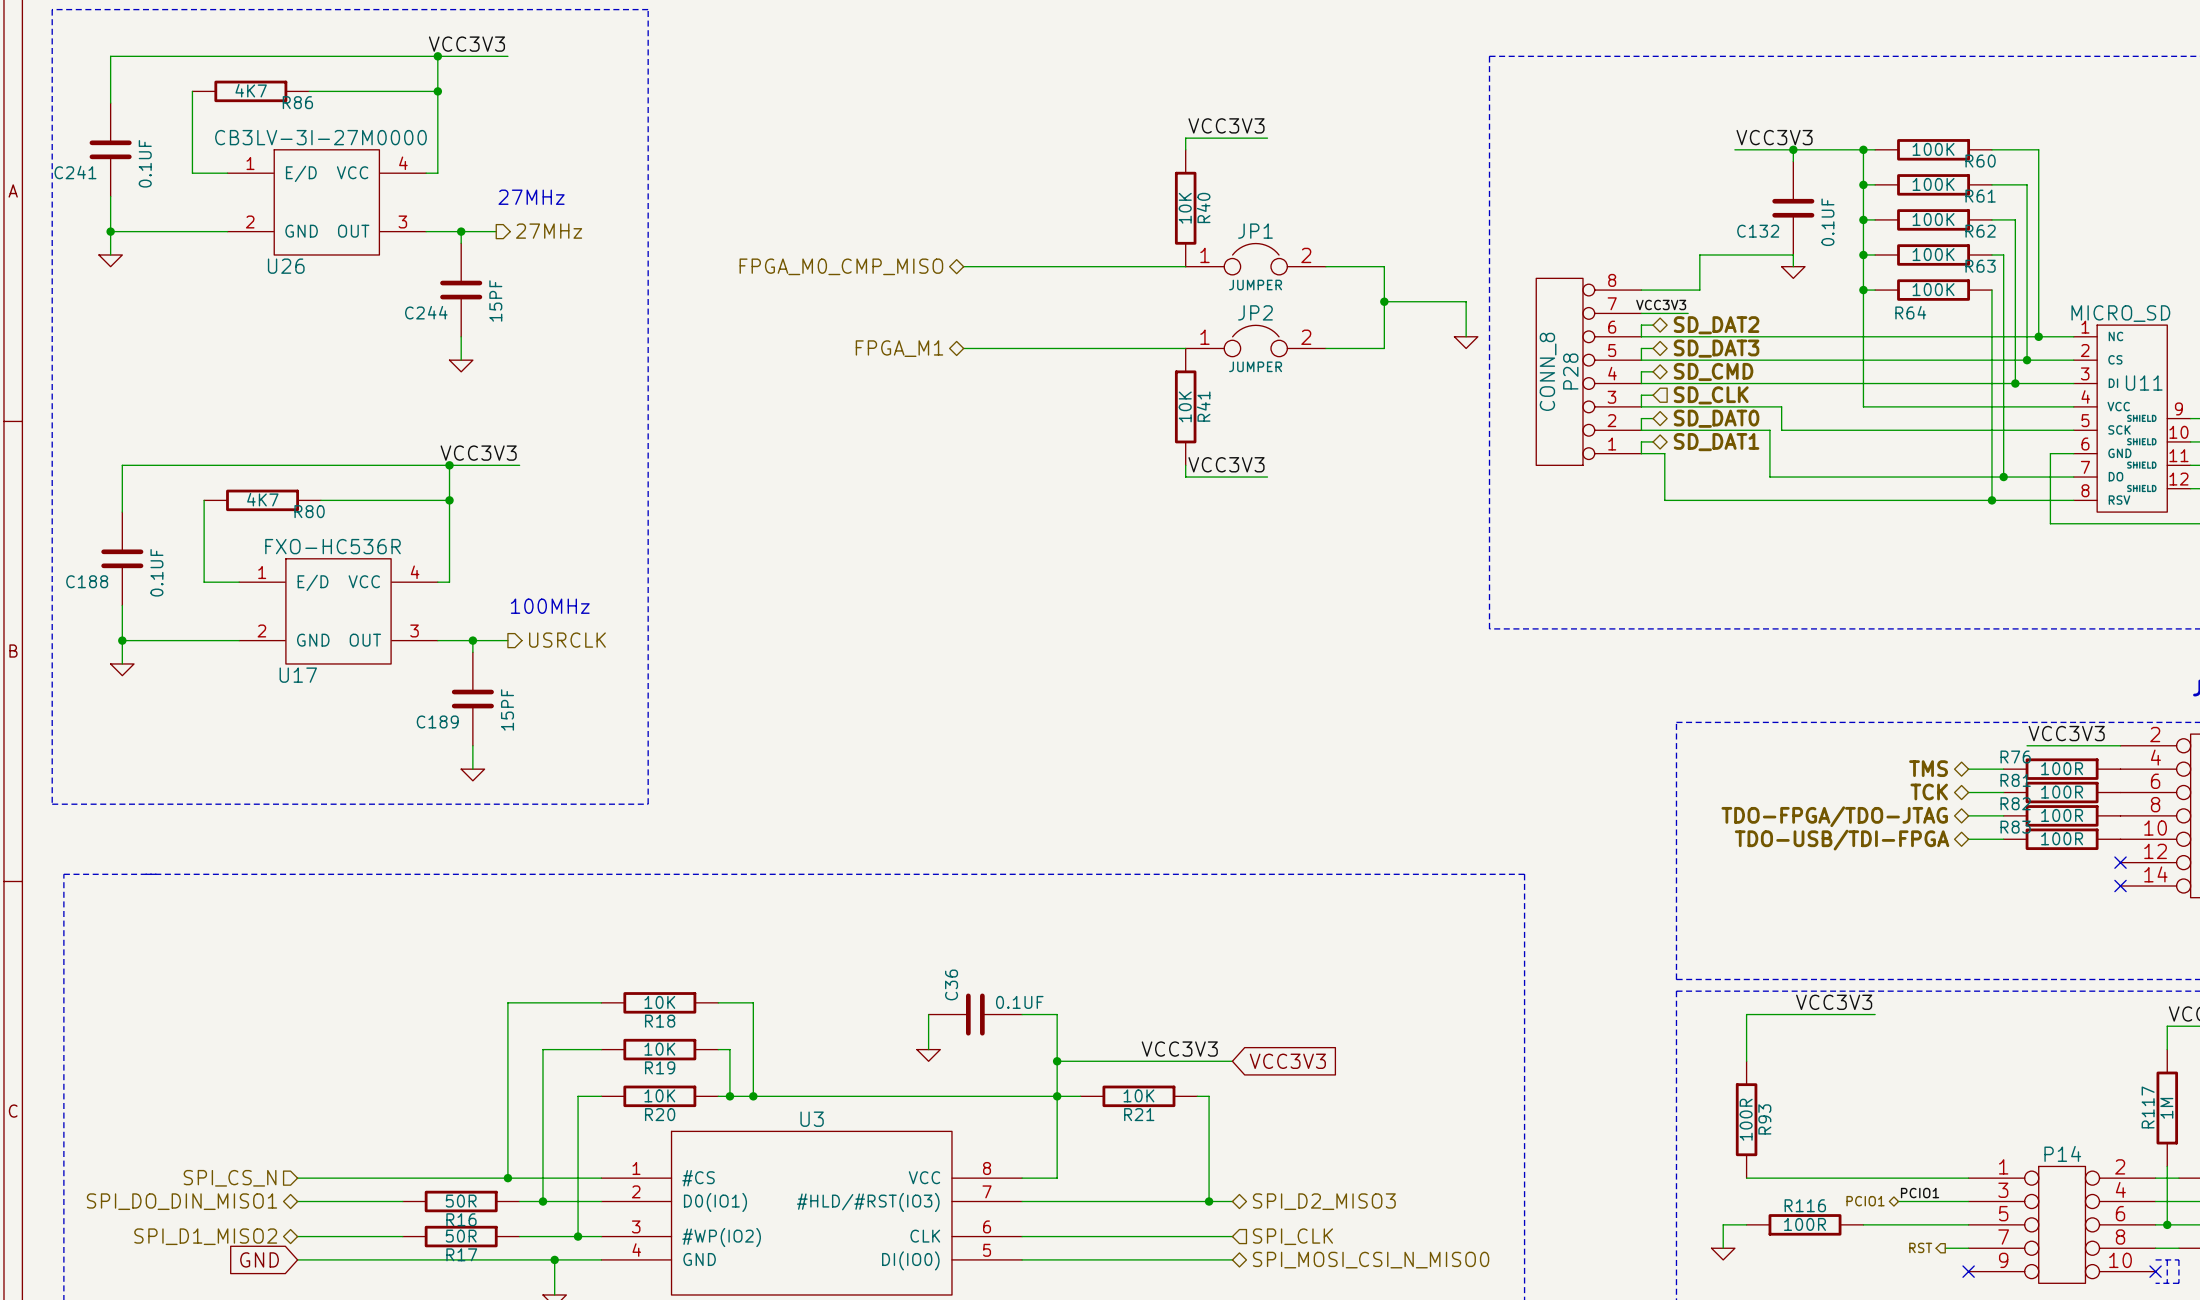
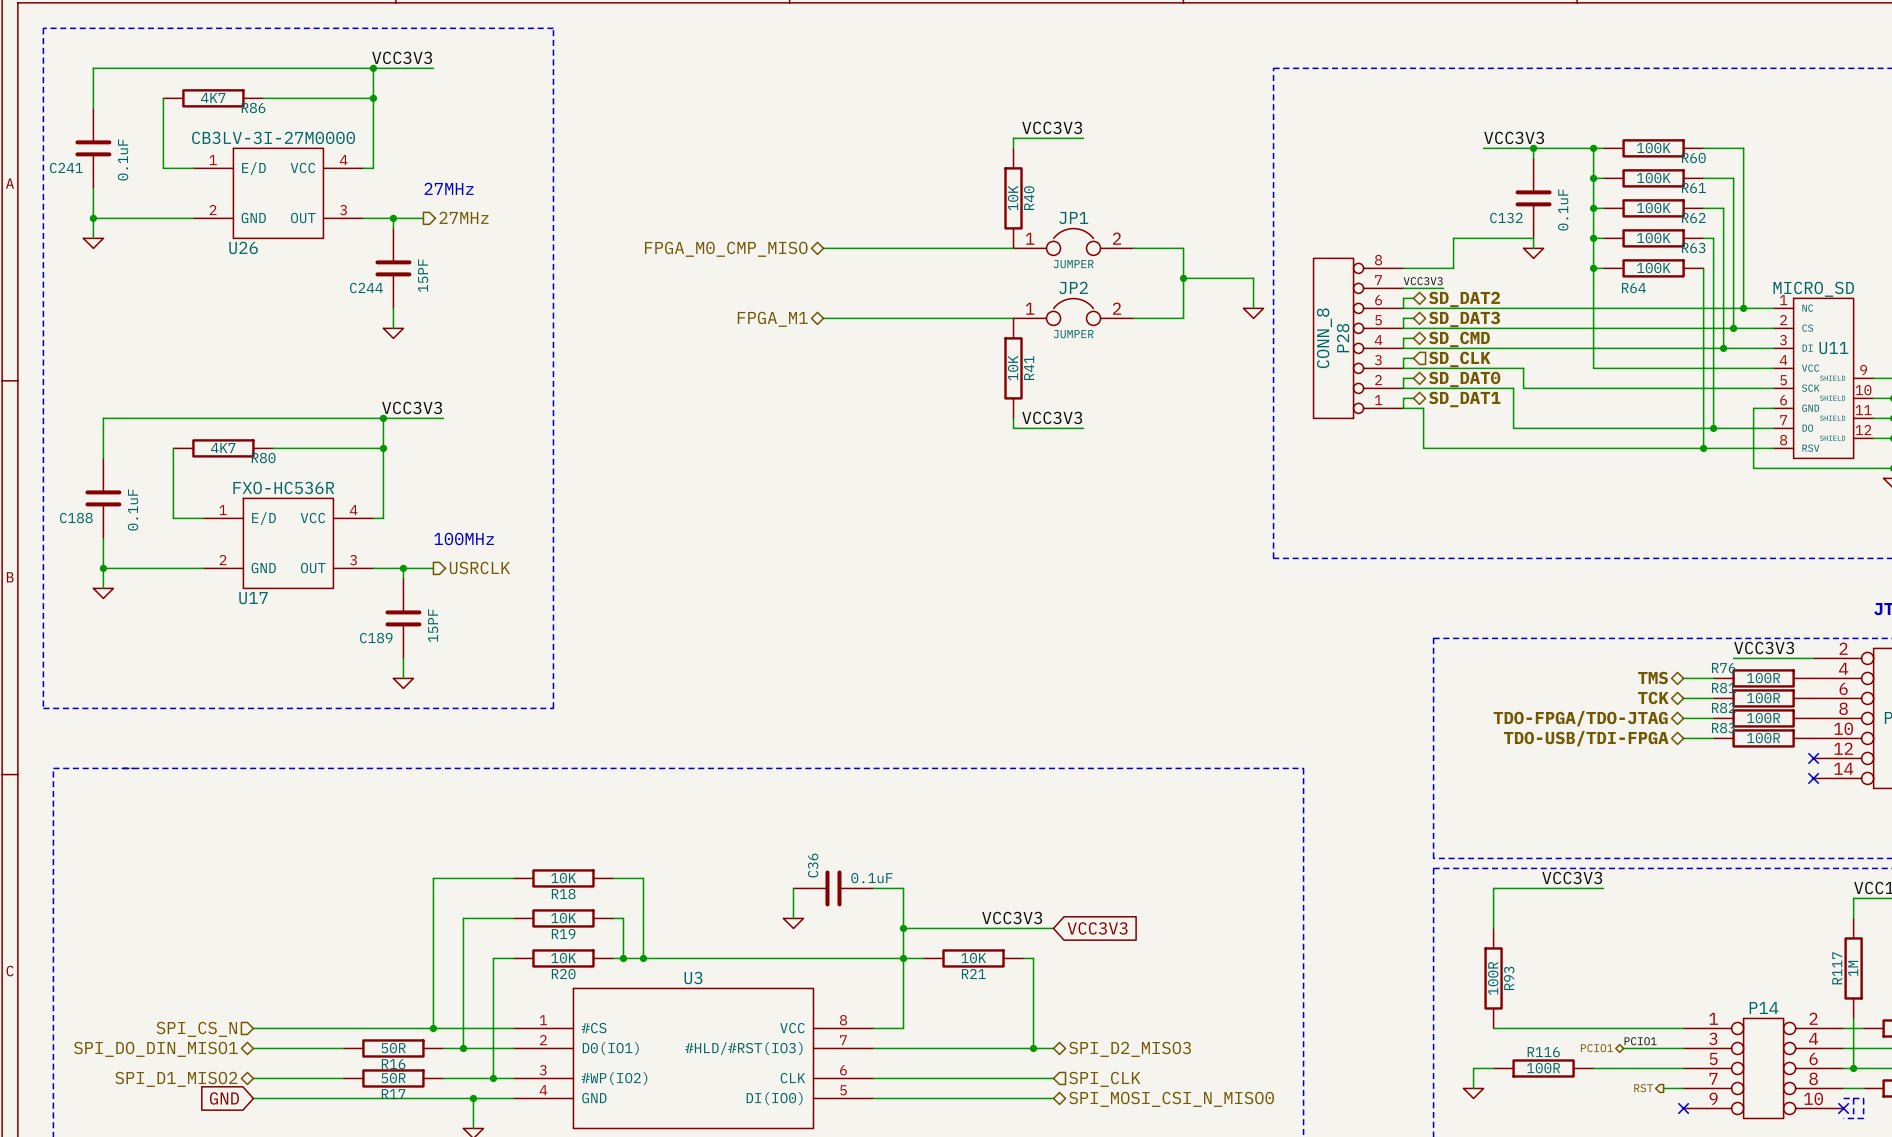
C241 value: 0.1UF (145, 163) -> 0.1uF (123, 159)
C132 value: 0.1UF (1827, 222) -> 0.1uF (1563, 209)
C188 value: 0.1UF (156, 572) -> 0.1uF (133, 510)
C36 value: 0.1UF (1019, 1002) -> 0.1uF (871, 878)

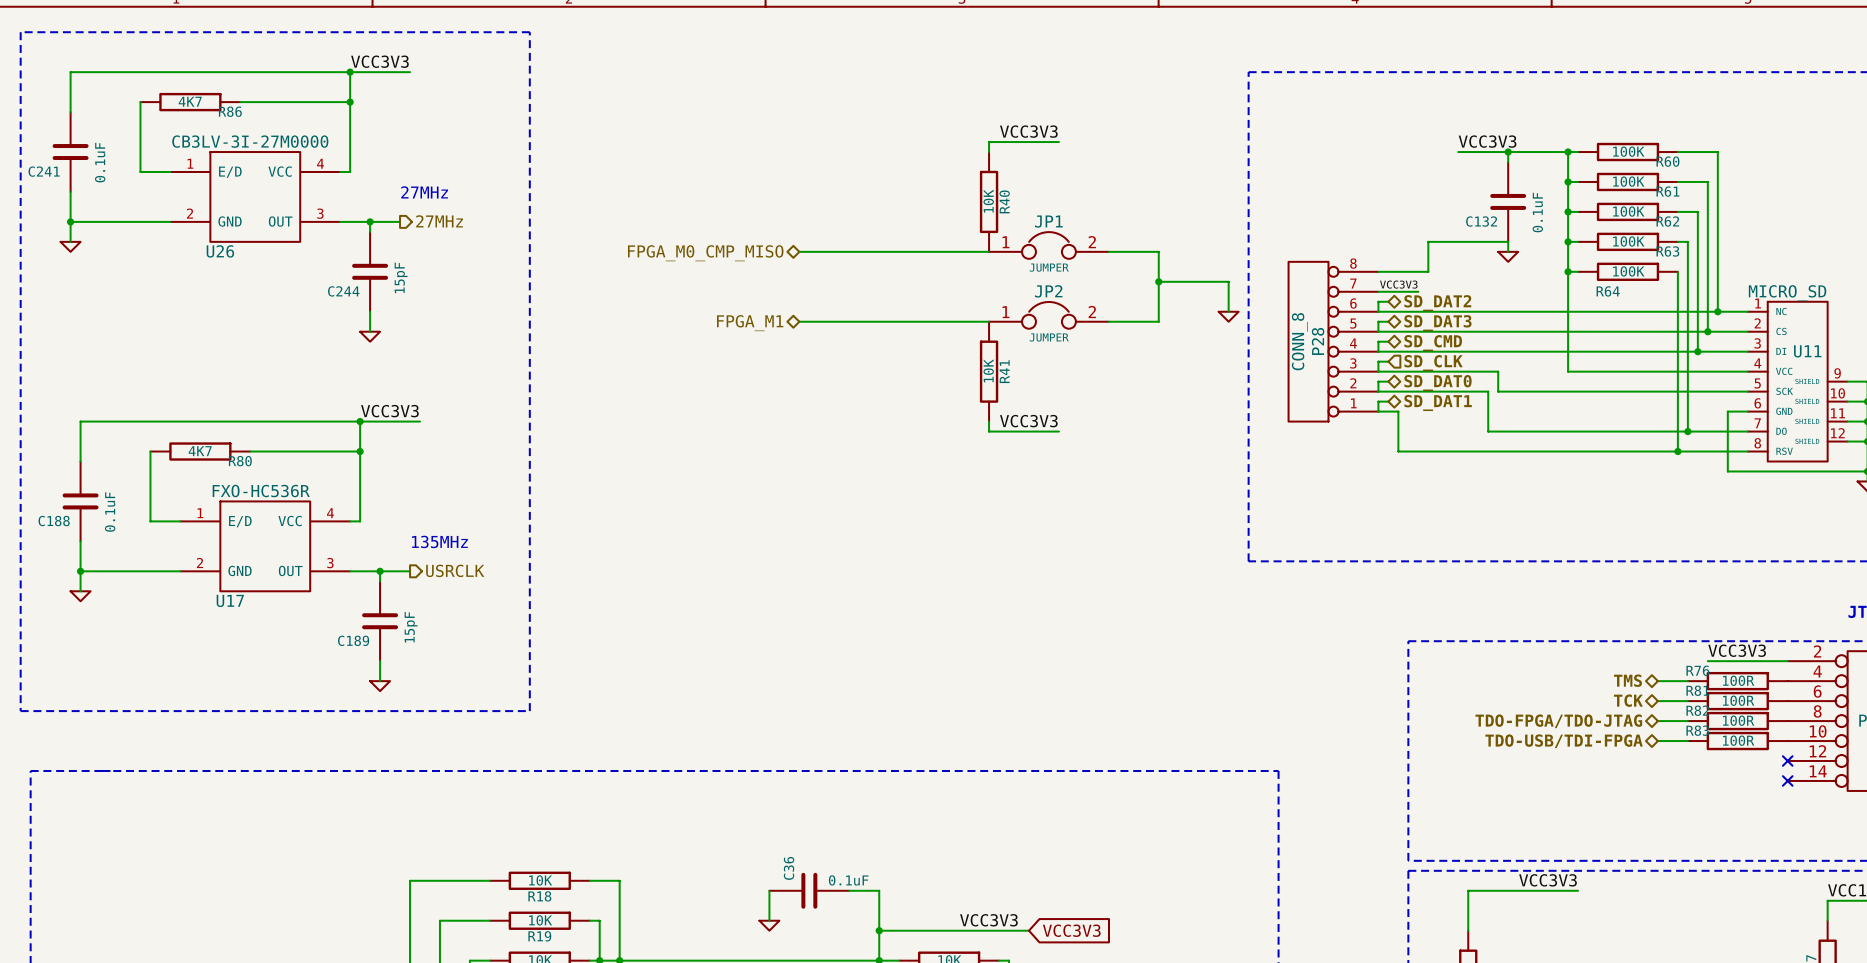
C244 value: 15PF (423, 275) -> 15pF (401, 277)
text: 100MHz (464, 538) -> 135MHz (439, 541)
C189 value: 15PF (433, 625) -> 15pF (411, 627)

